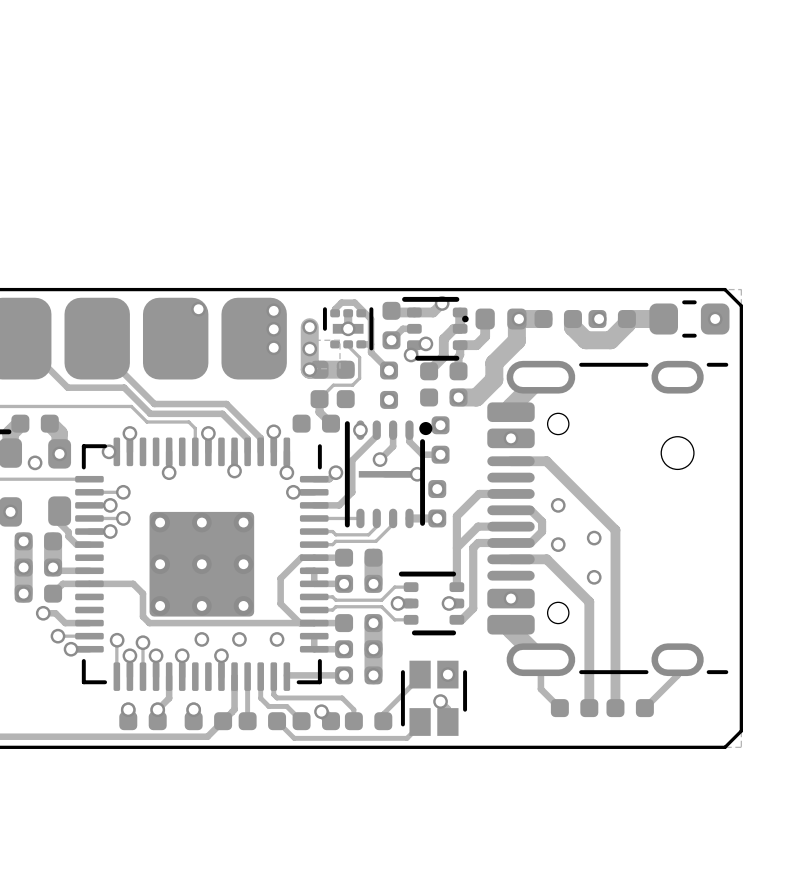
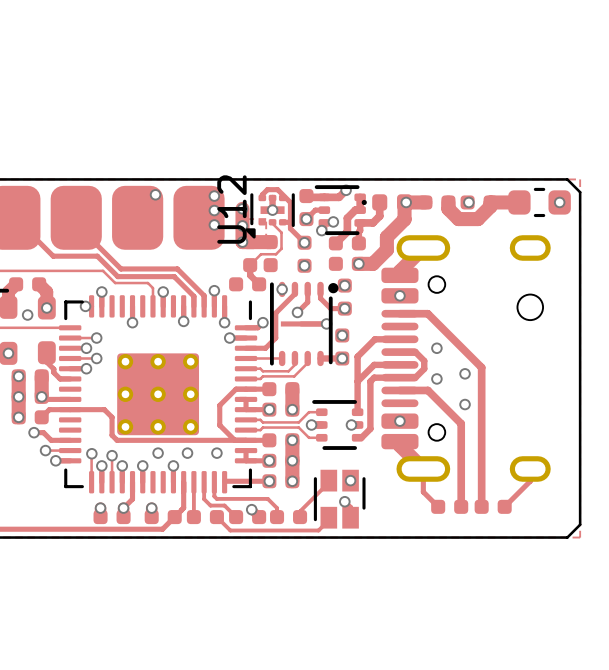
part: (348, 328) -> none
U12: none -> (270, 215)
part footprint: [487, 360, 729, 677] -> [381, 235, 551, 482]

